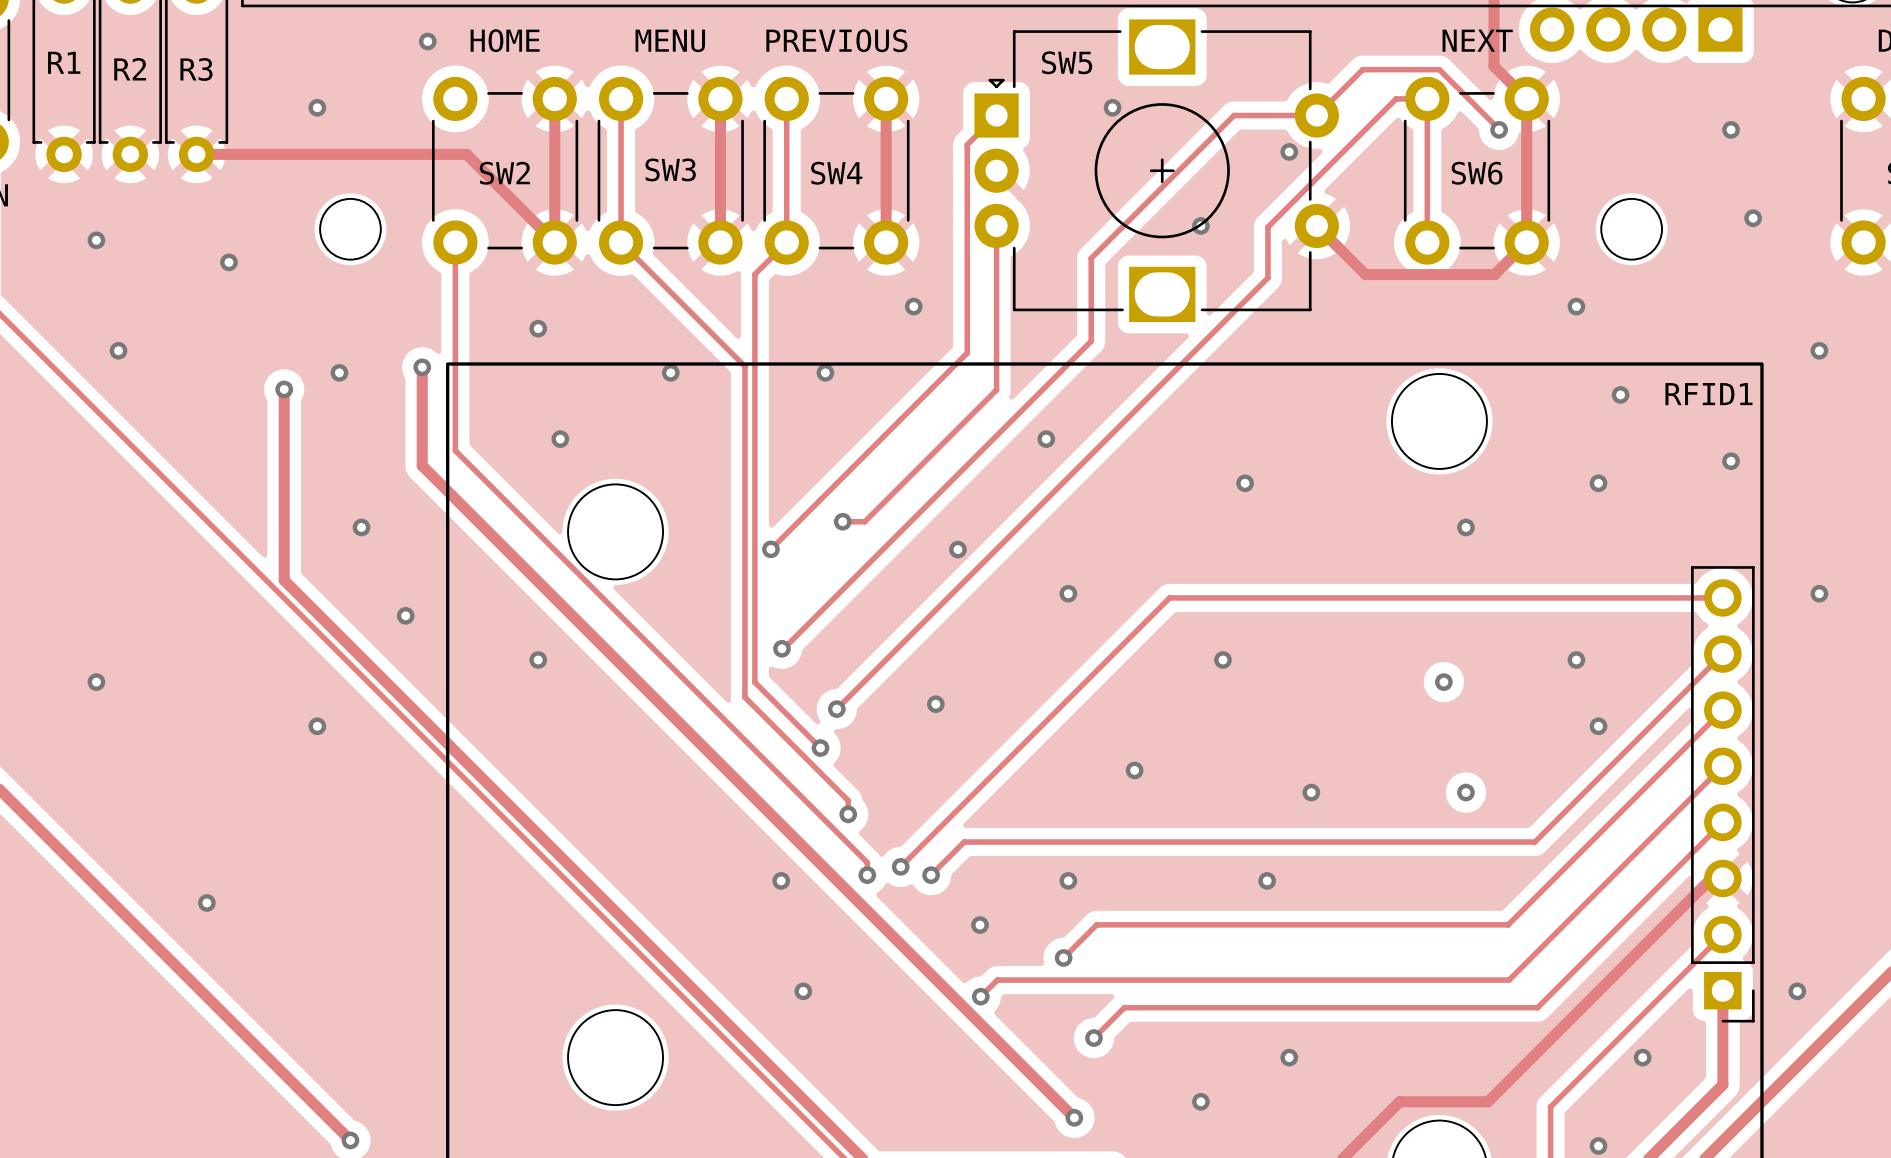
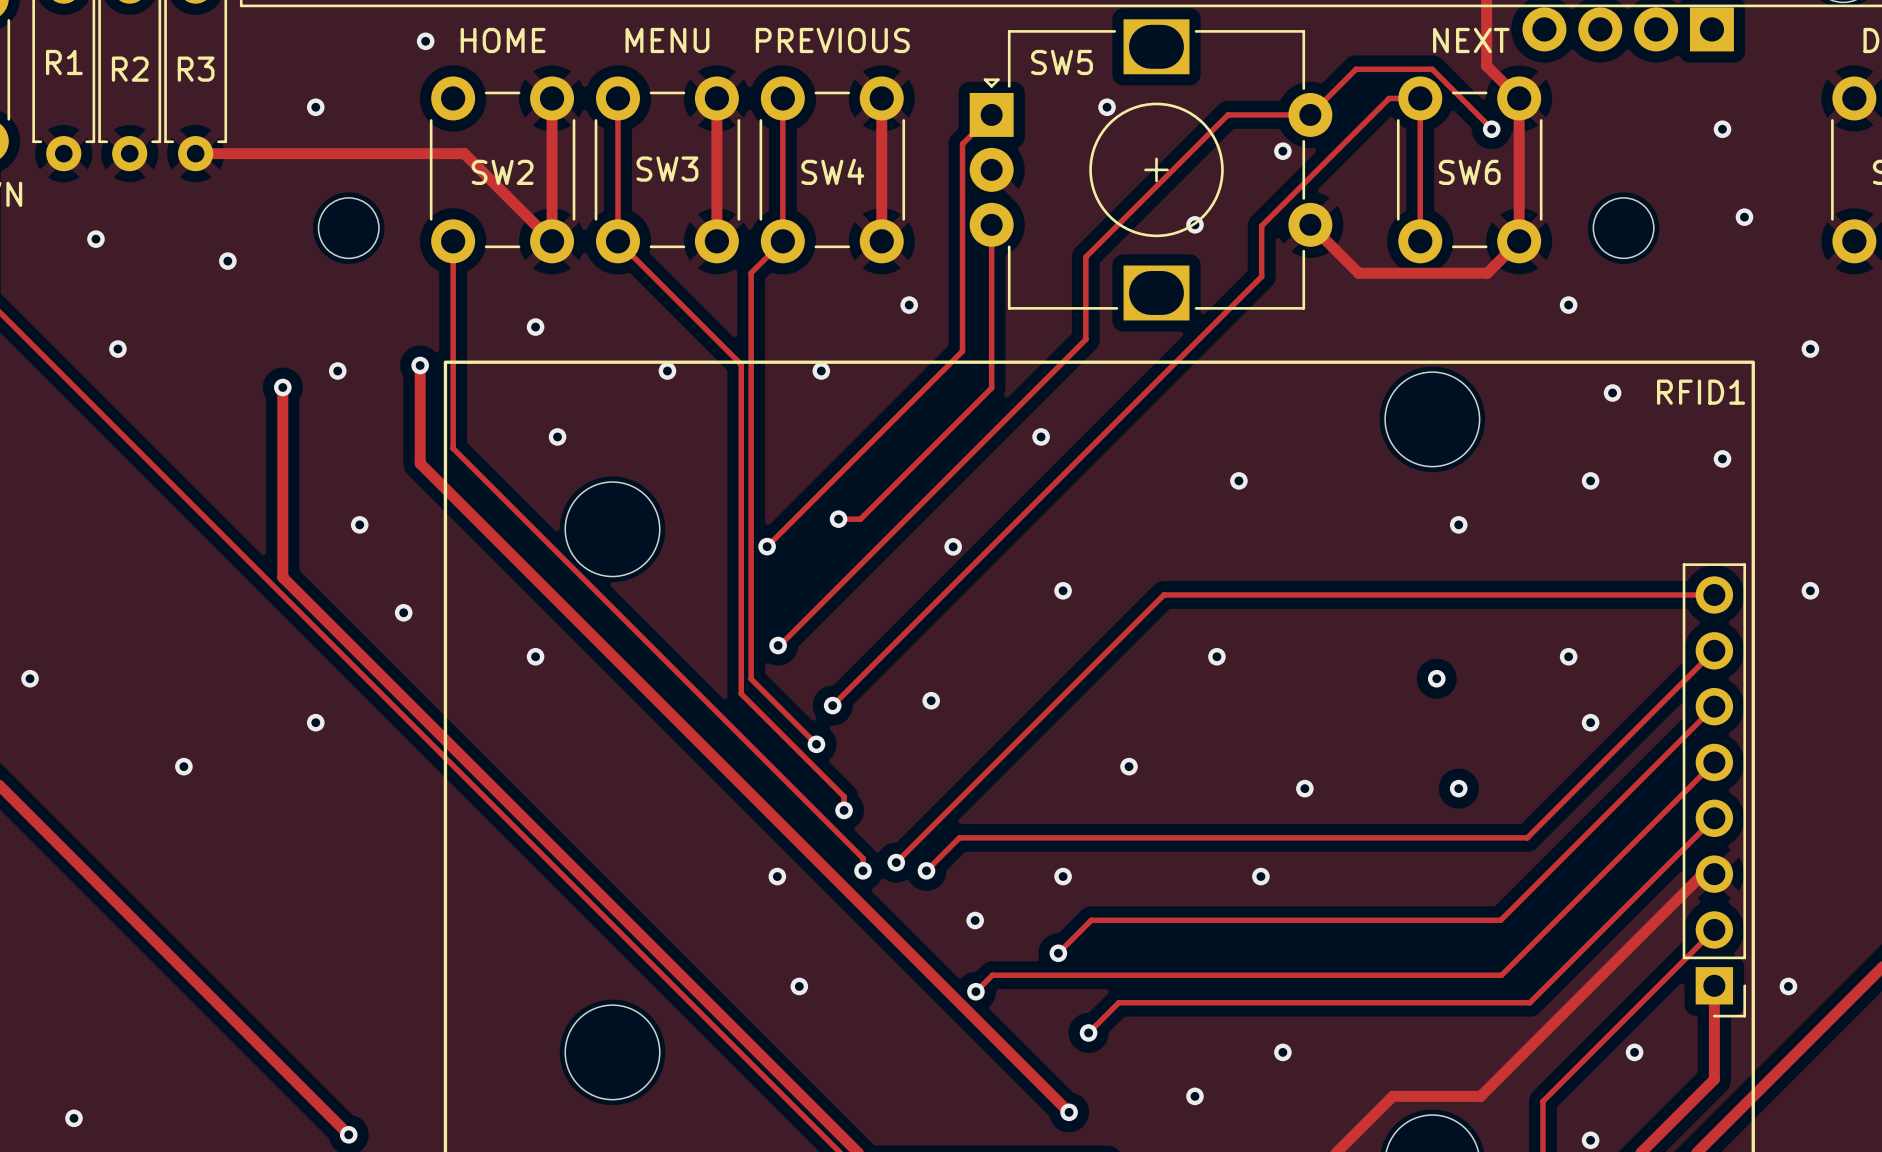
via: none -> (30, 678)
via: (96, 682) -> none
via: none -> (183, 766)
via: (206, 902) -> none
via: none -> (73, 1118)

